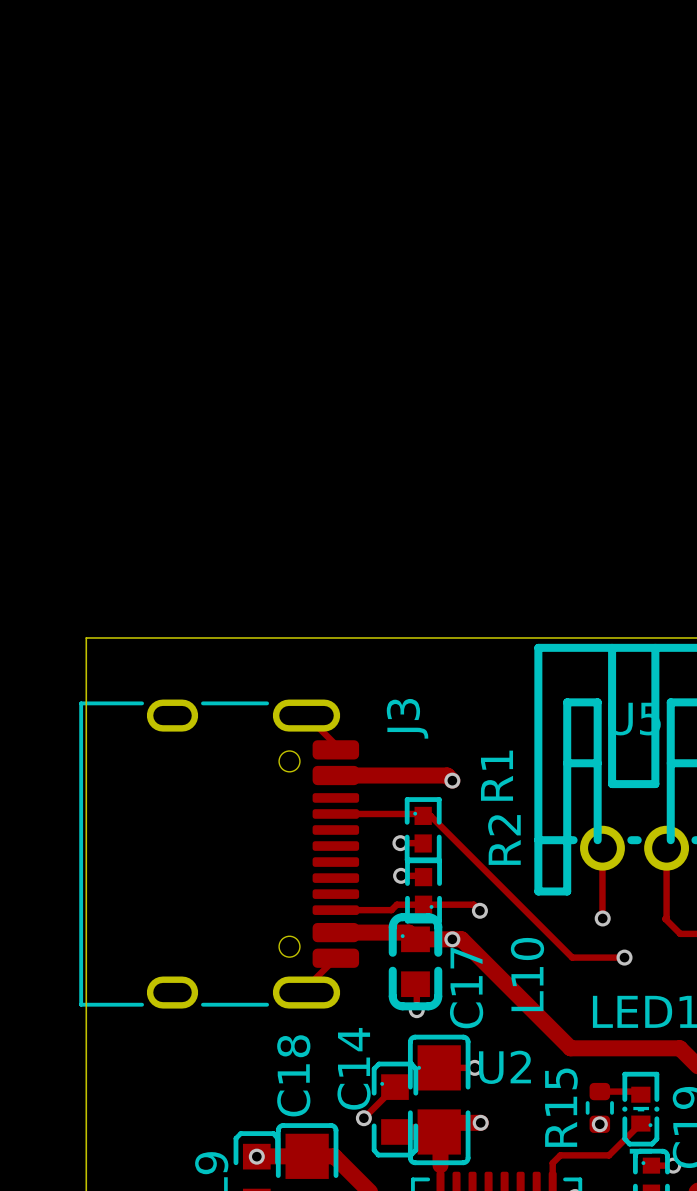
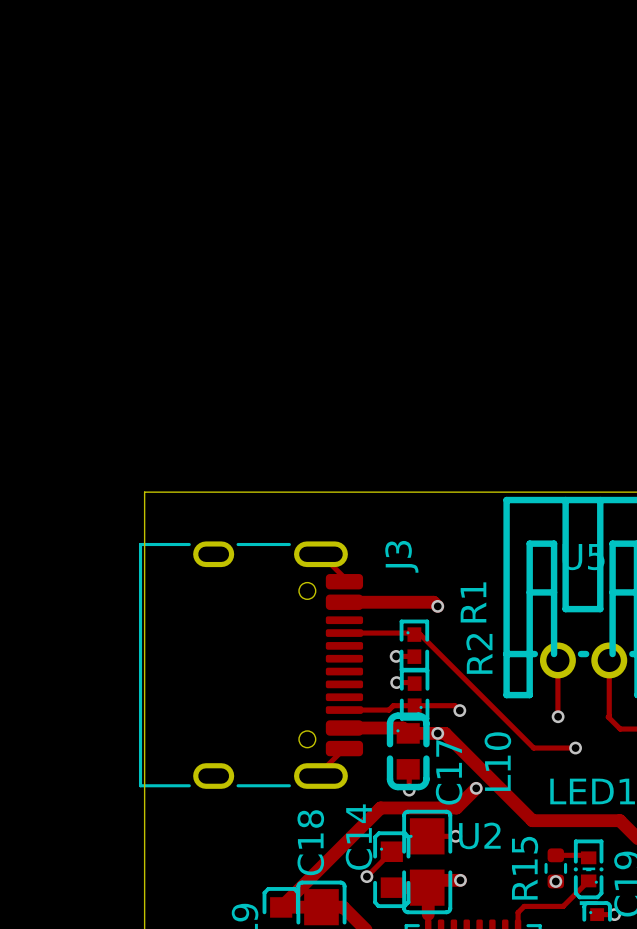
track: none -> (476, 788) (456, 807) (380, 807) (281, 907)
via: none -> (476, 788)
via: (256, 1156) -> none

